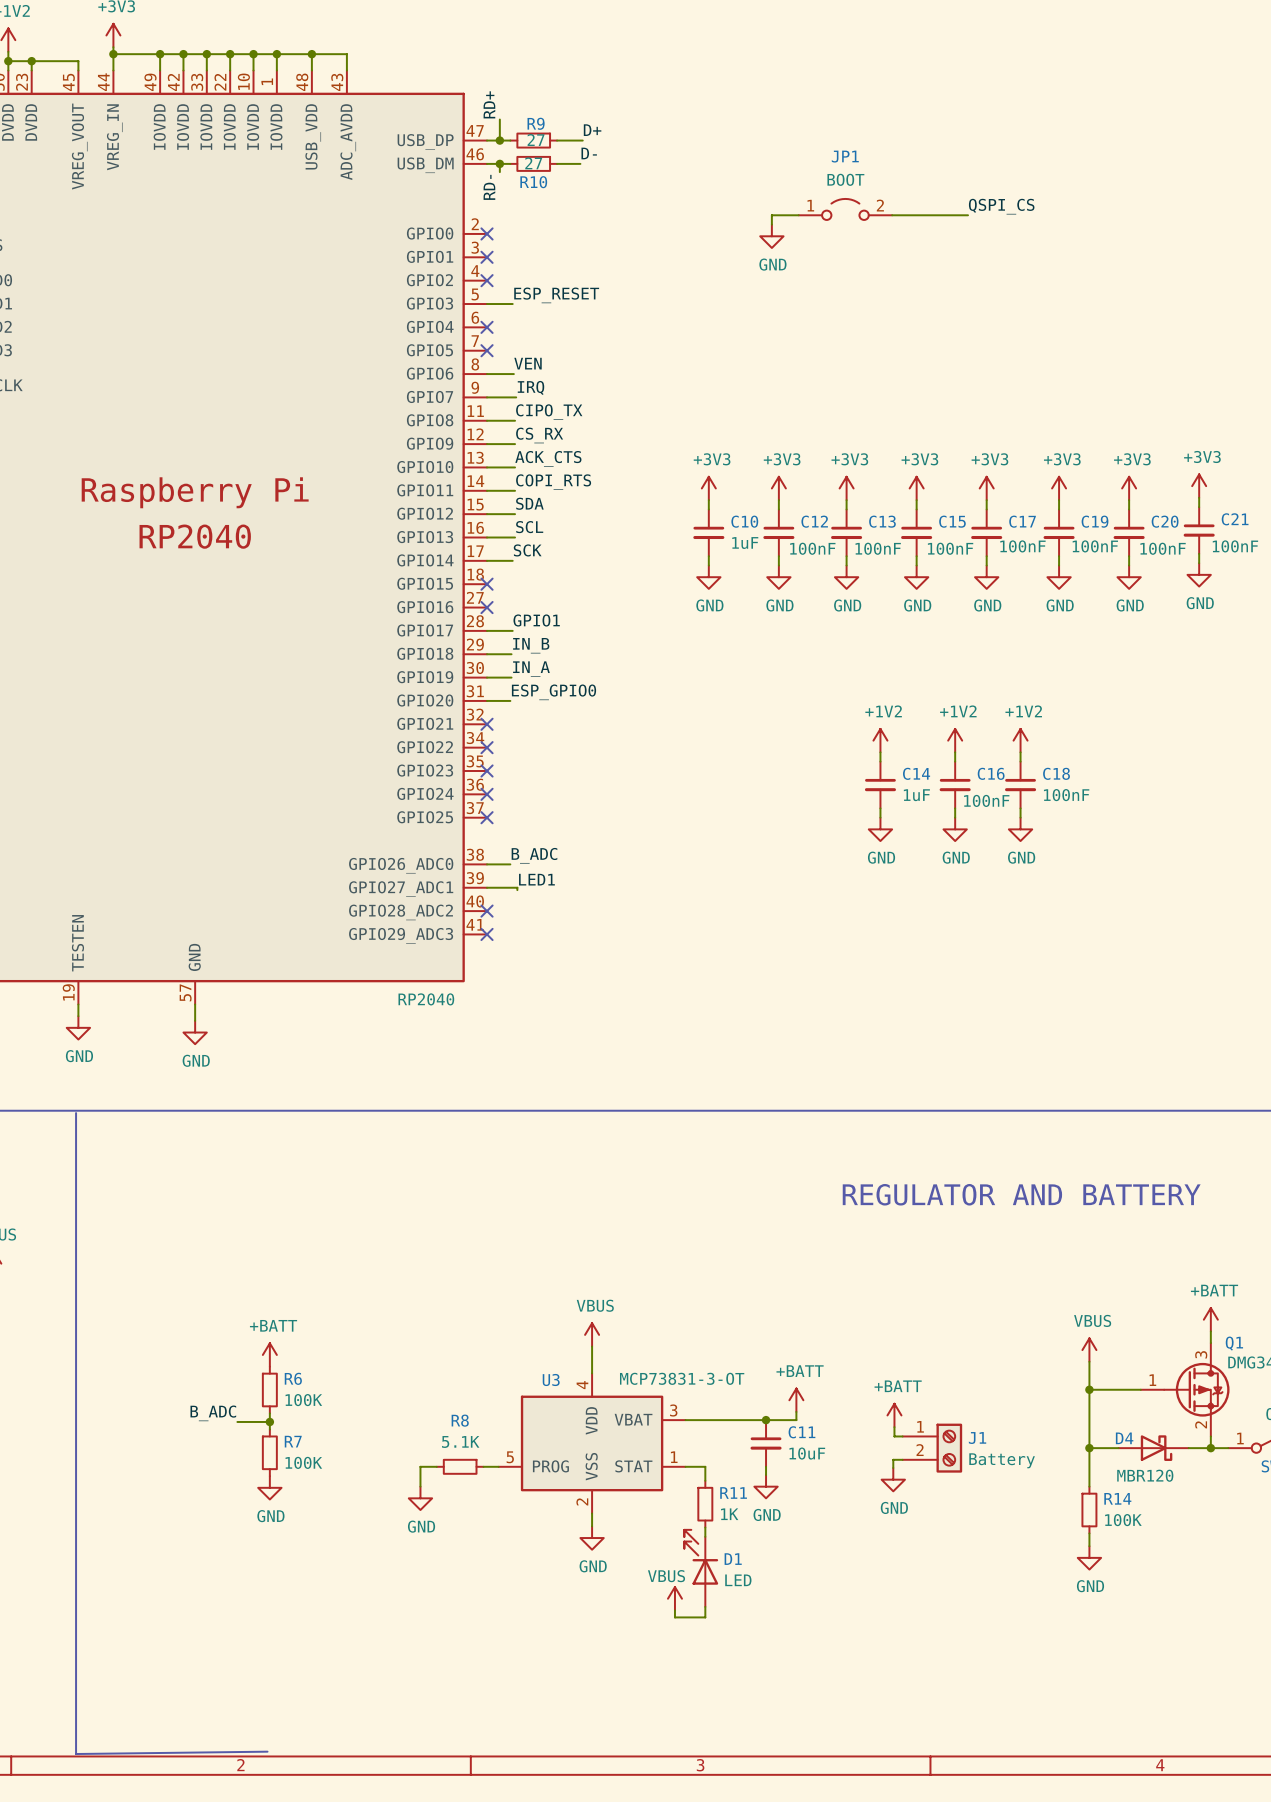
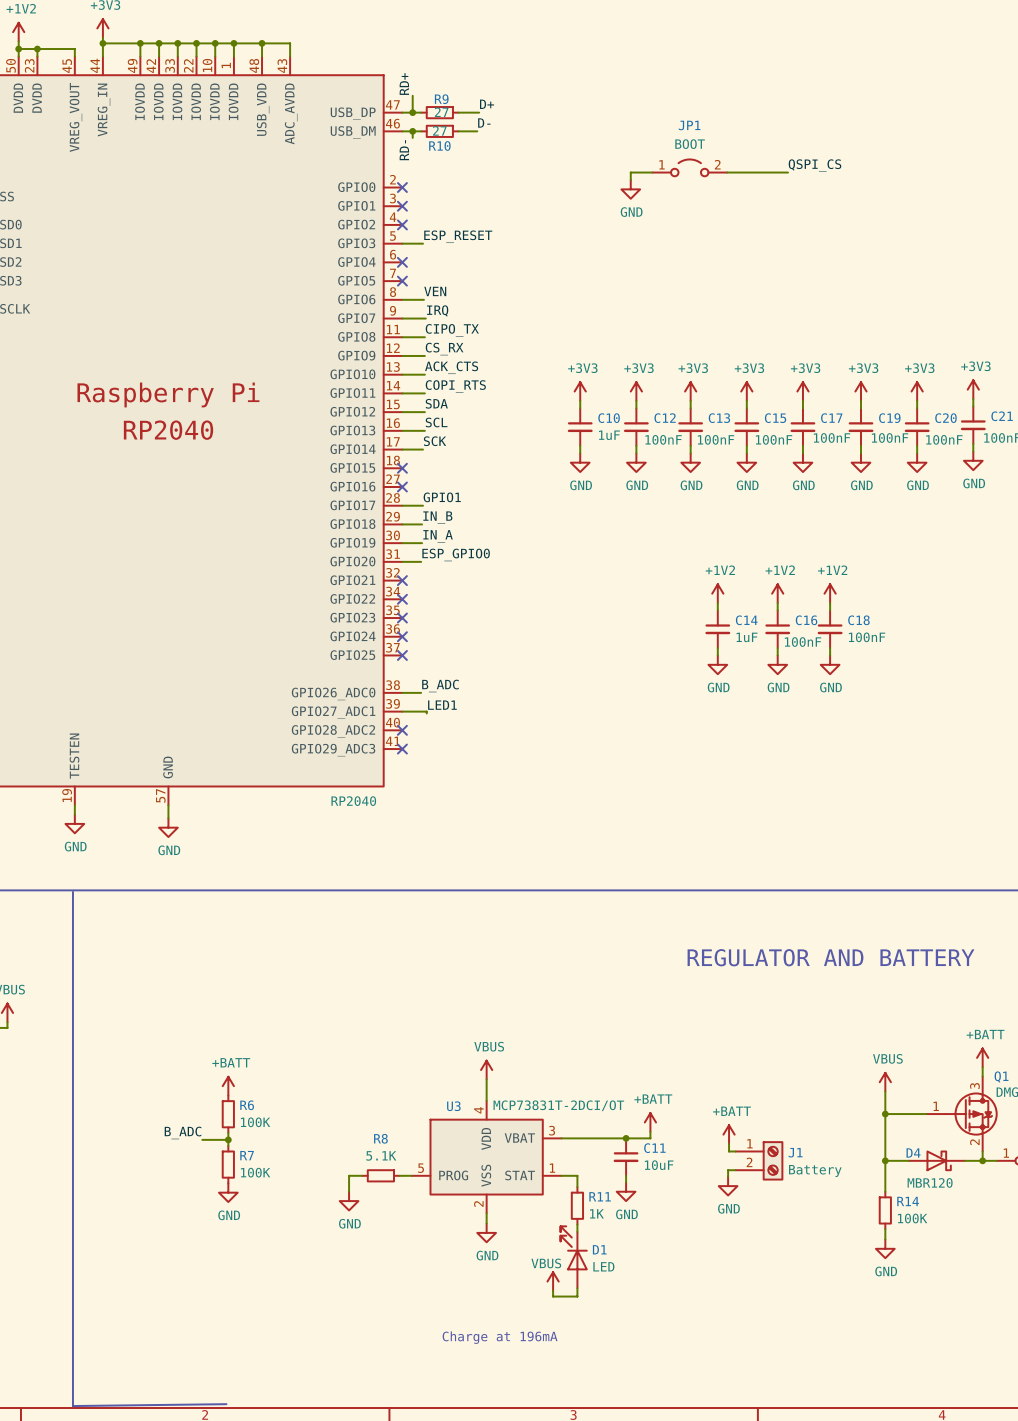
U3 value: MCP73831-3-OT (682, 1378) -> MCP73831T-2DCI/OT (558, 1105)
text: none -> Charge at 196mA (500, 1337)

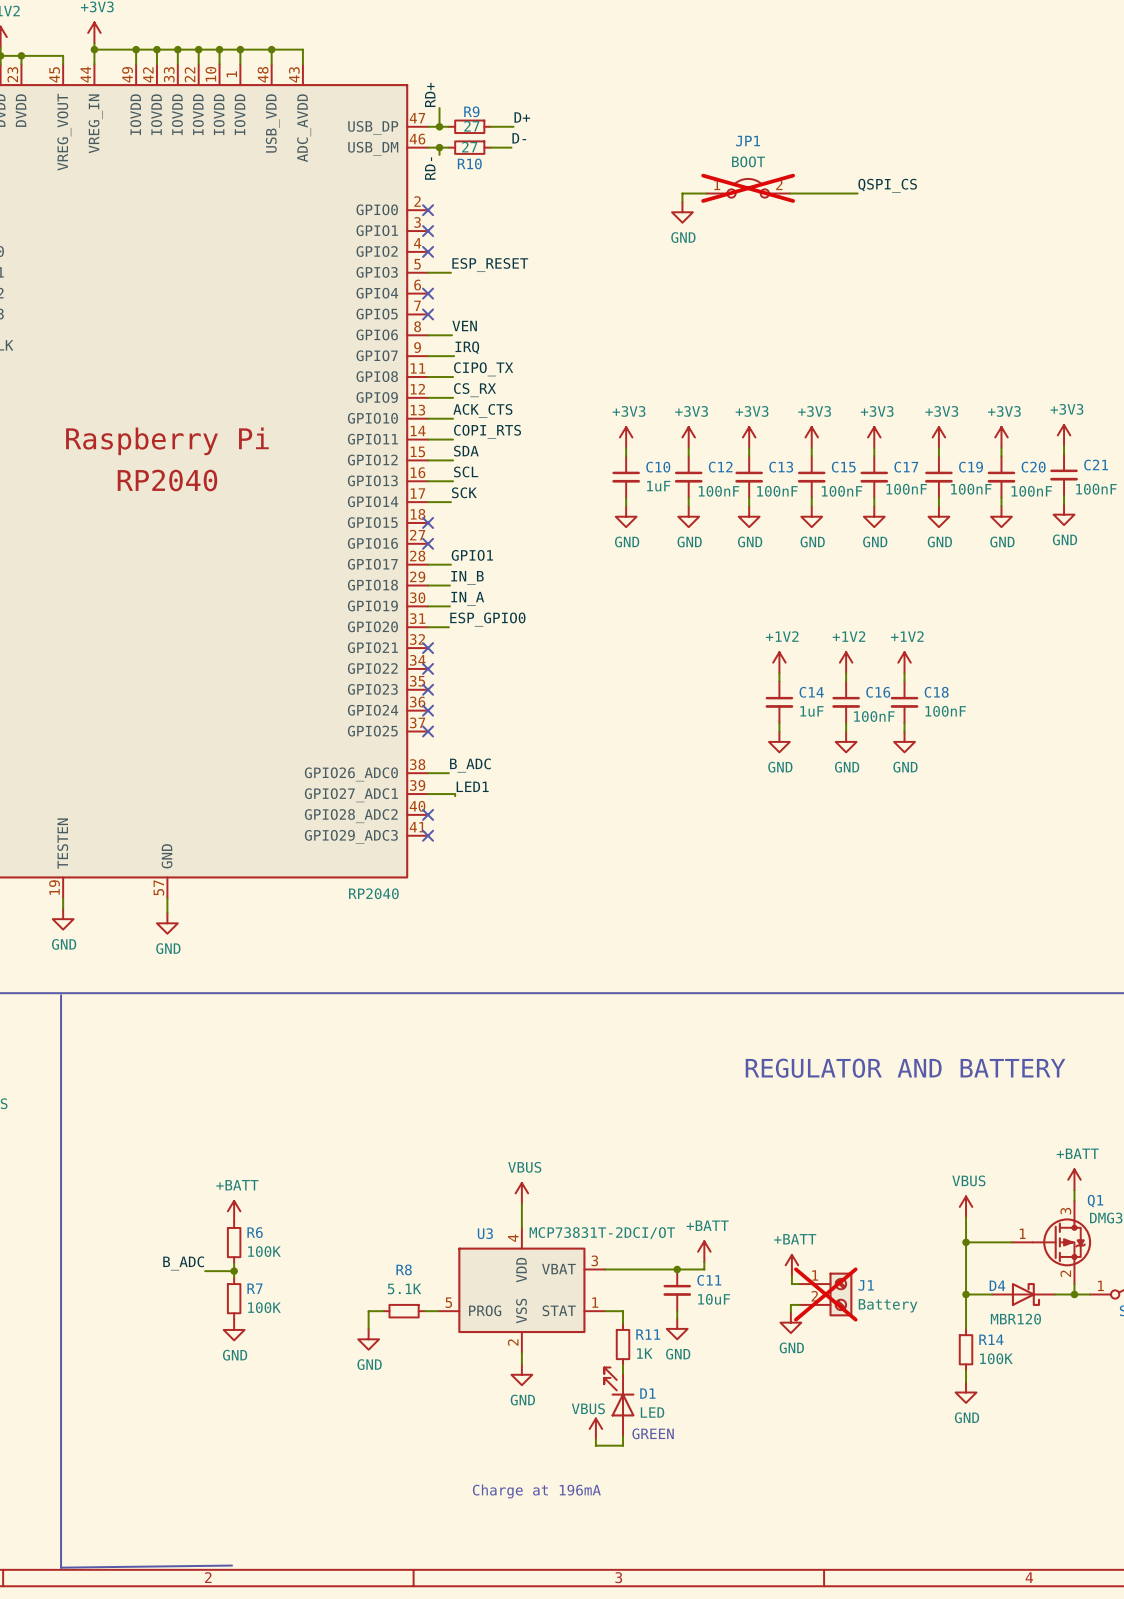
JP1 do-not-place cross: none -> (748, 188)
J1 do-not-place cross: none -> (825, 1294)
text: none -> GREEN (653, 1433)

